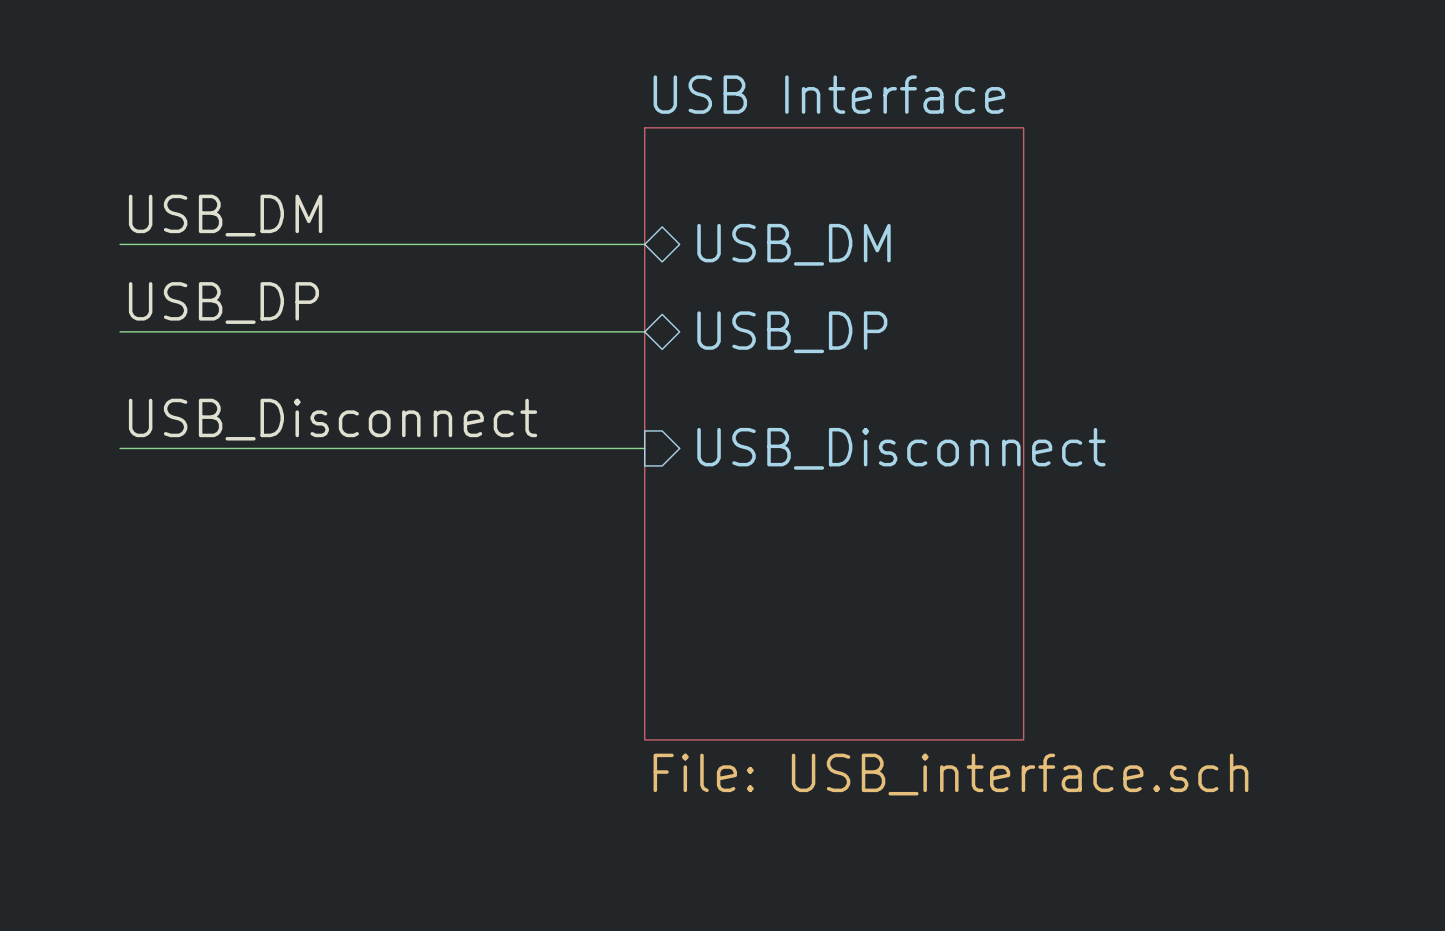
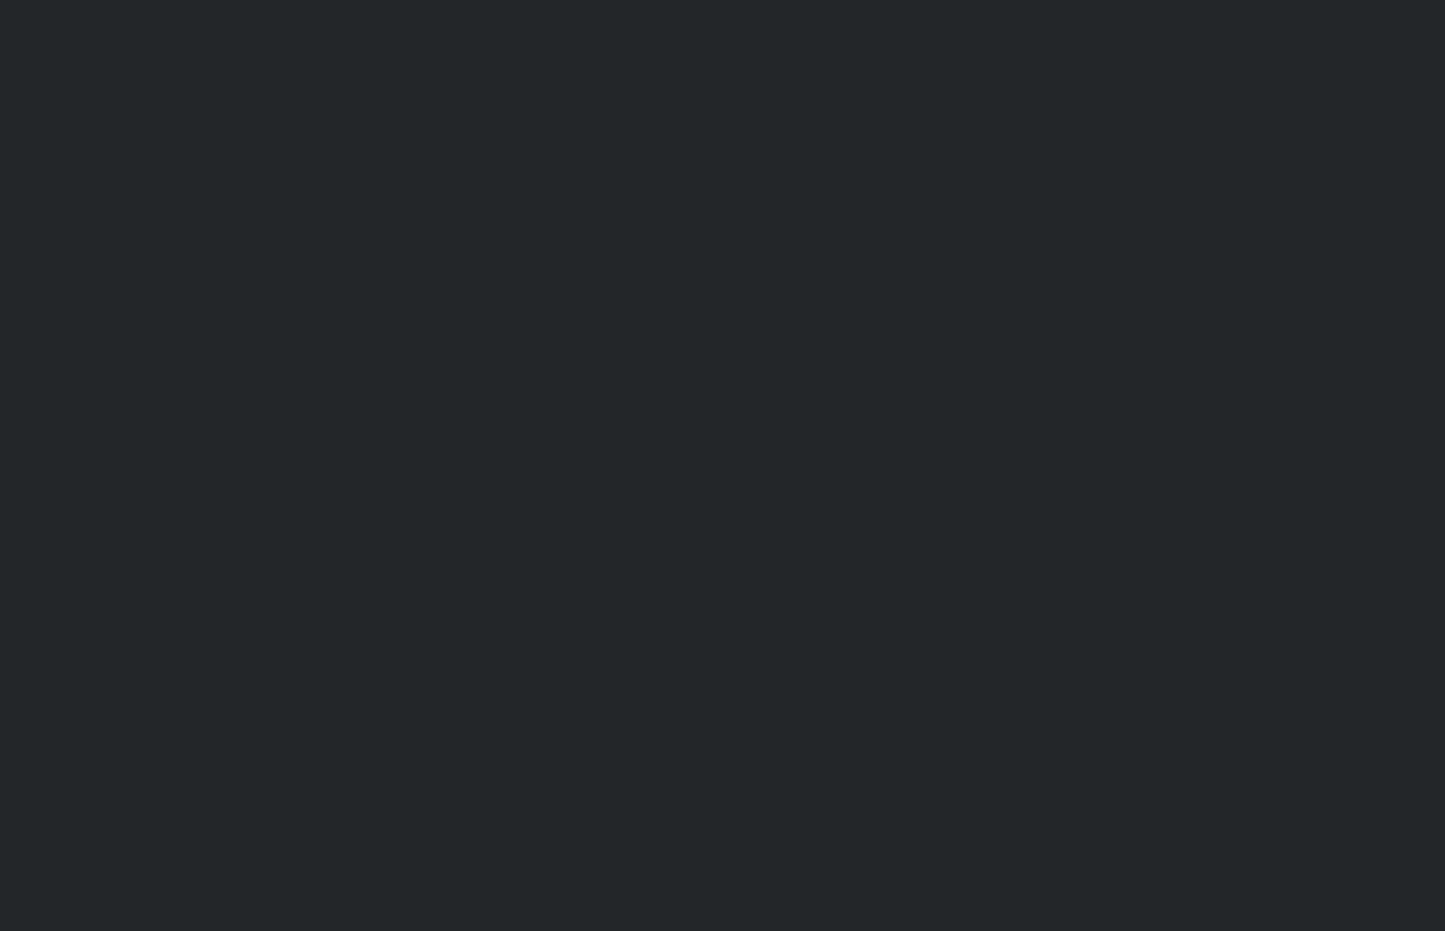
label: USB_DM (225, 215) -> none
wire: (120, 244) (644, 244) -> none
sheet pin: USB_DM (793, 244) -> none
label: USB_DP (223, 303) -> none
wire: (120, 331) (644, 331) -> none
sheet pin: USB_DP (792, 332) -> none
label: USB_Disconnect (333, 419) -> none
sheet USB Interface: File: USB_interface.sch (834, 433) -> none
wire: (120, 448) (644, 448) -> none
sheet pin: USB_Disconnect (901, 448) -> none

